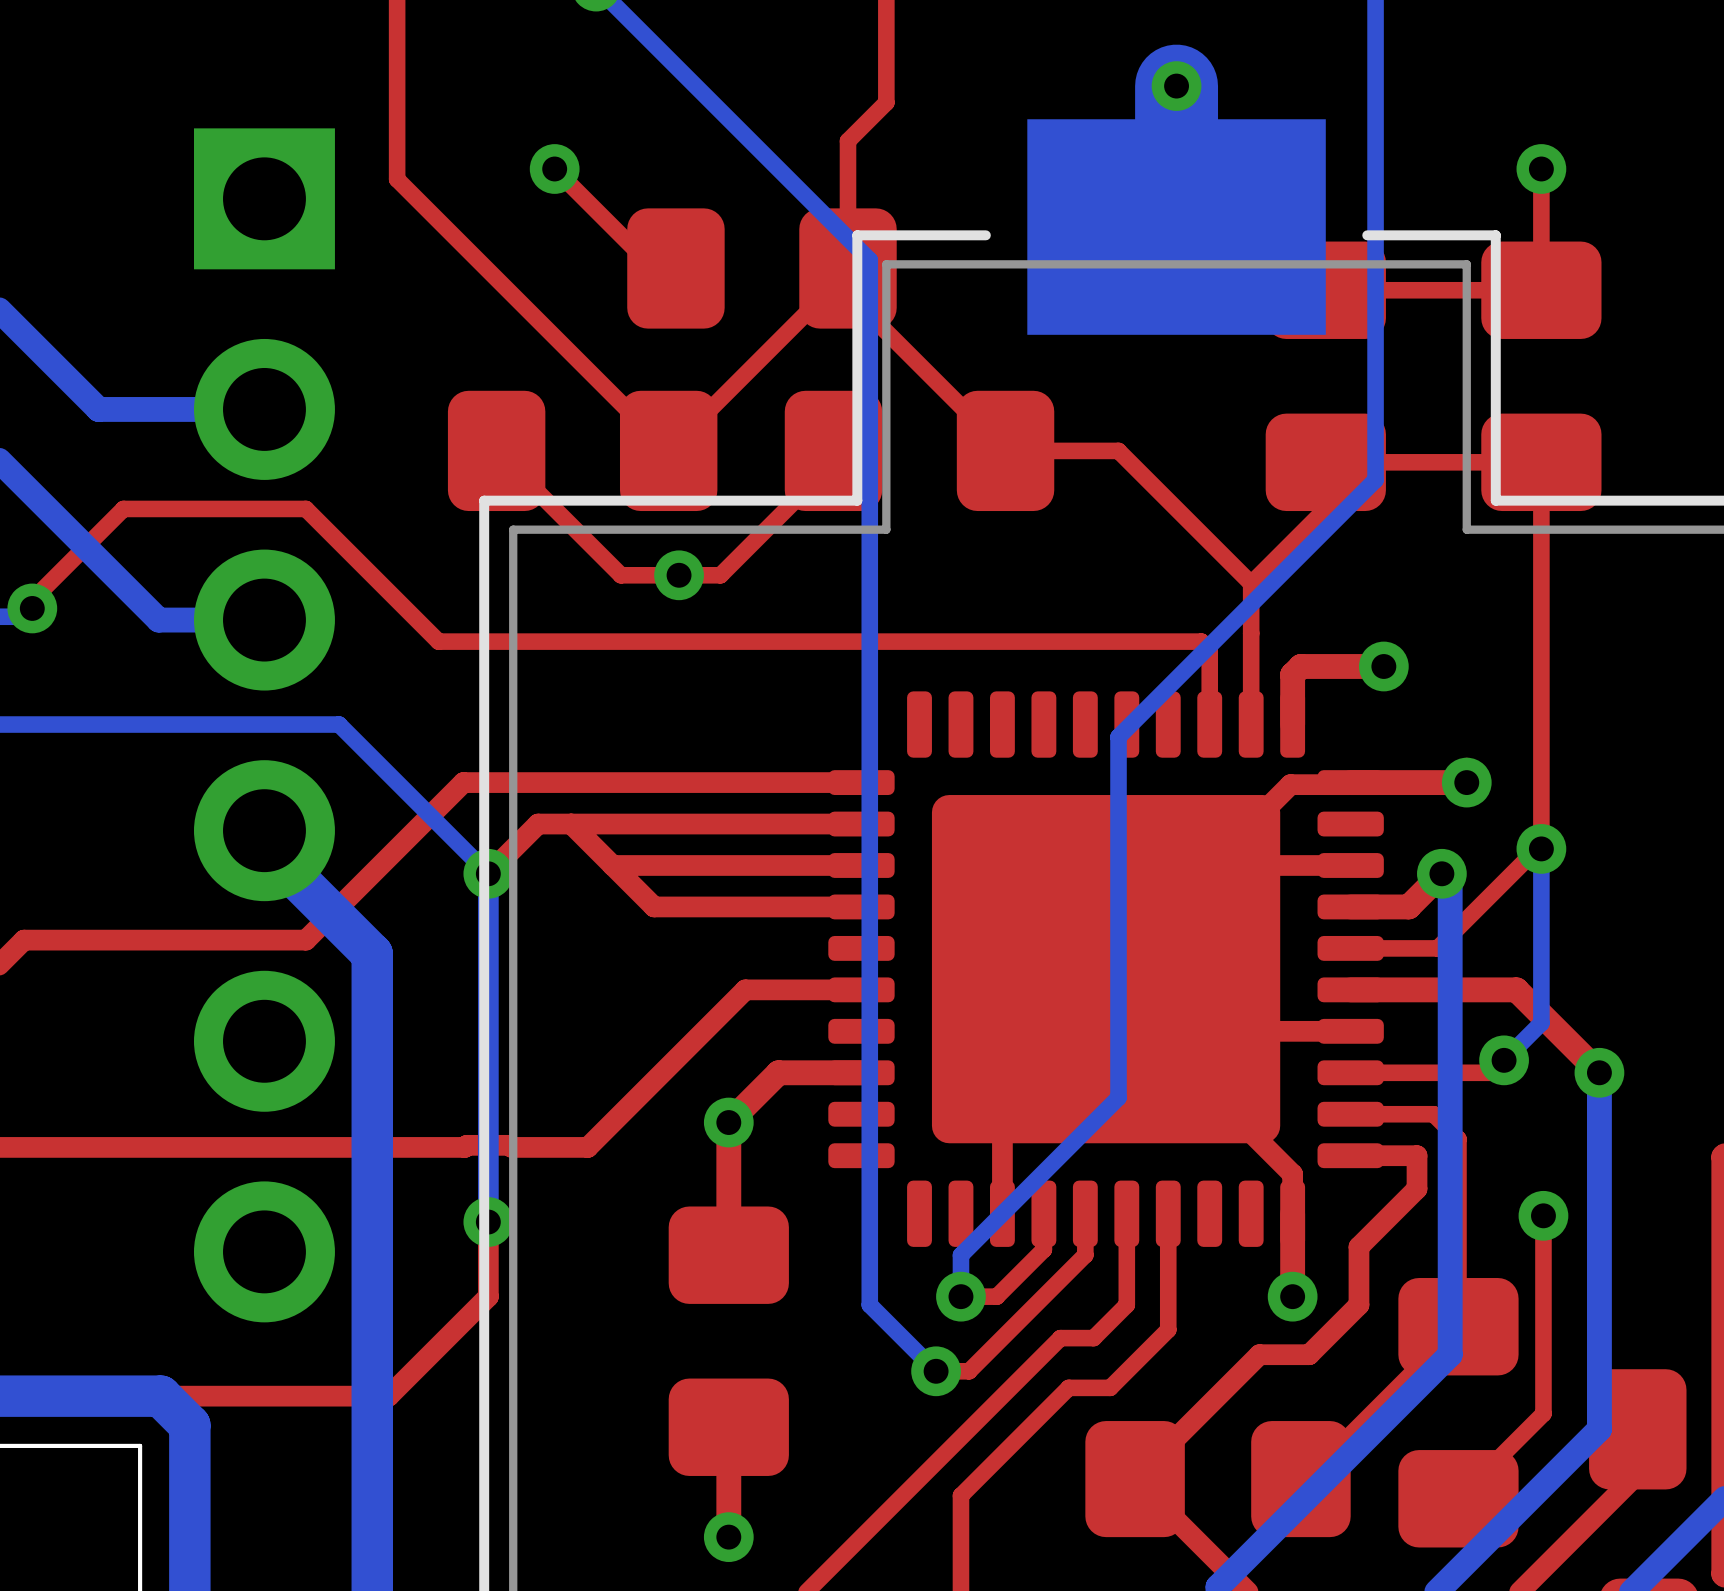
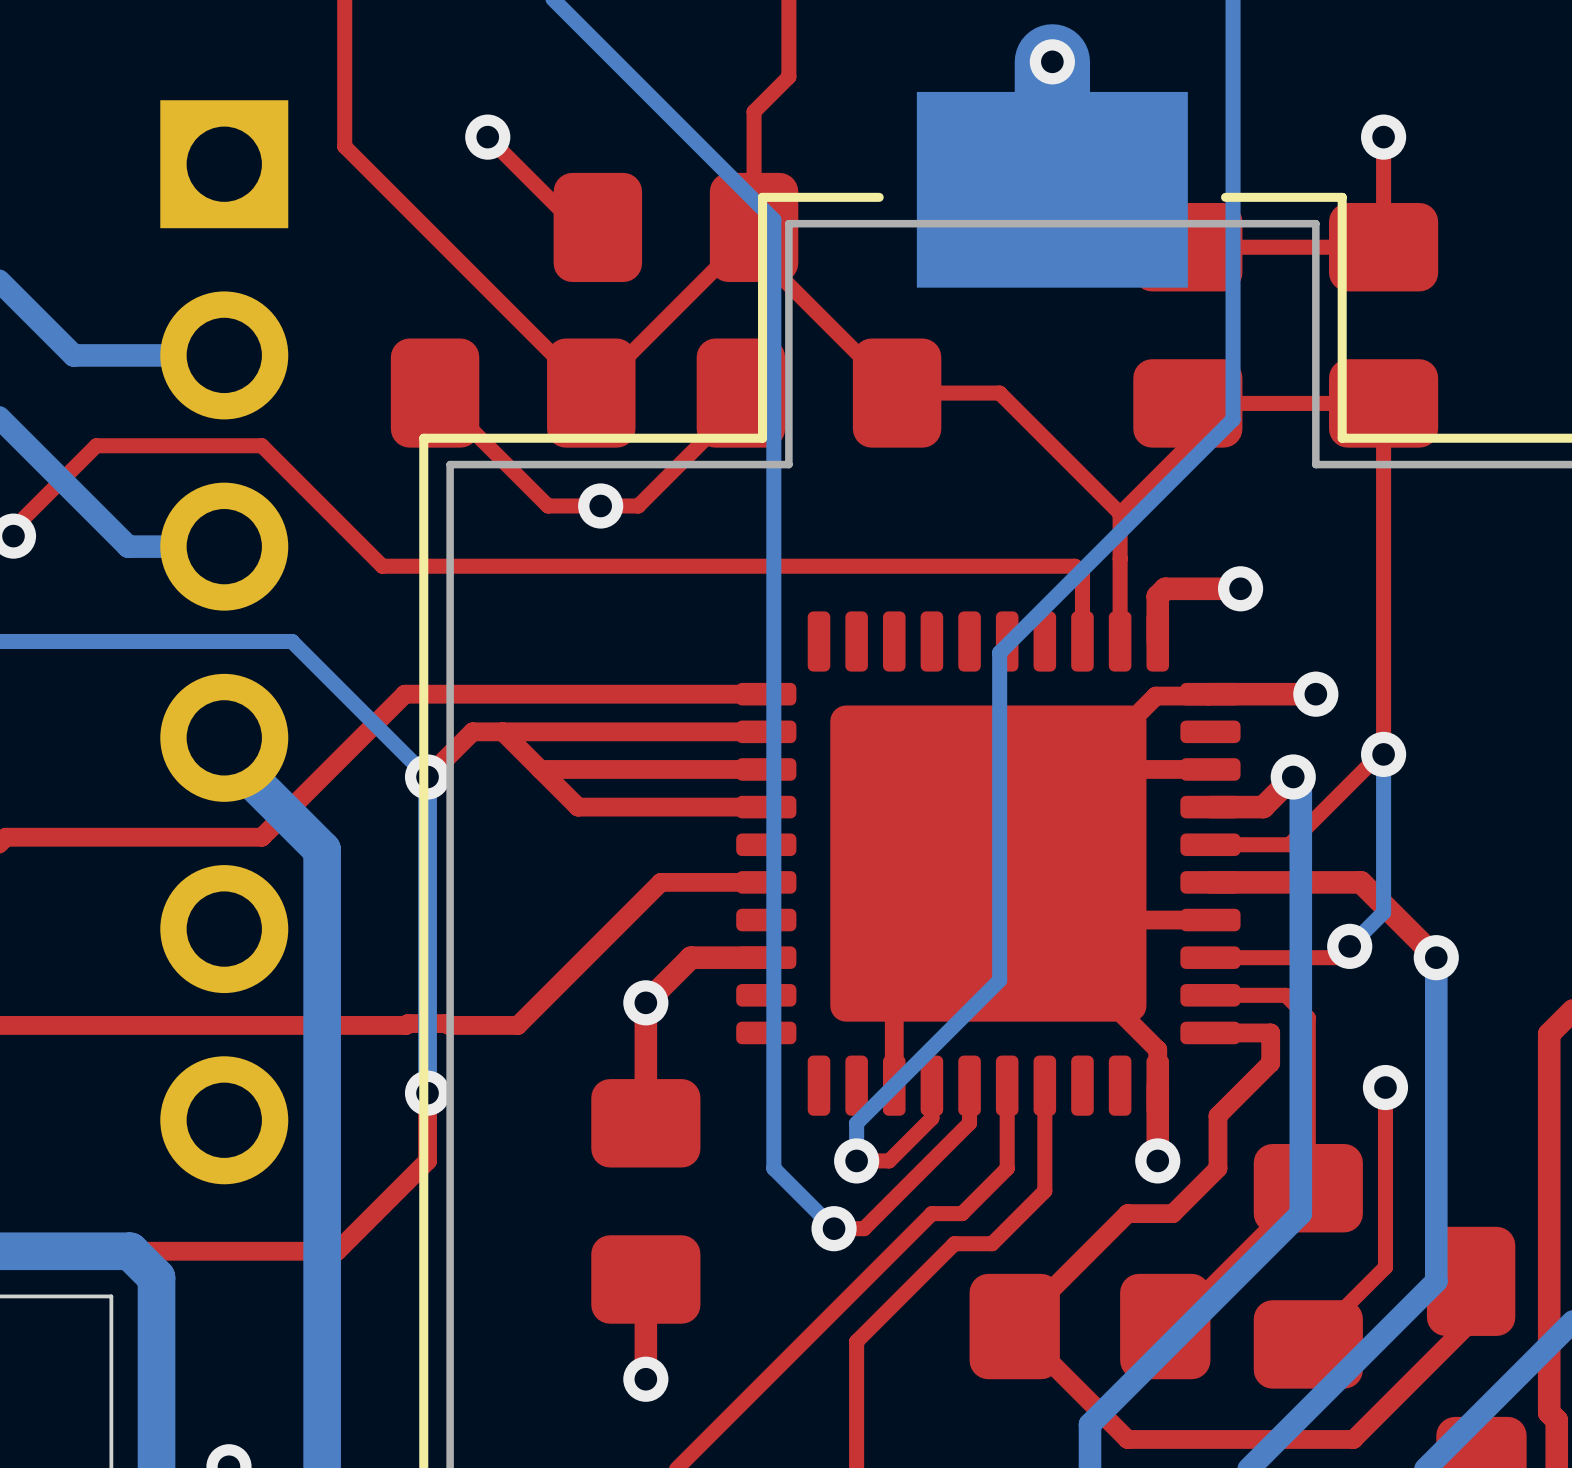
top track: (1093, 1338) (1060, 1338) (1043, 1354) -> (977, 1198) (962, 1213) (931, 1213)

